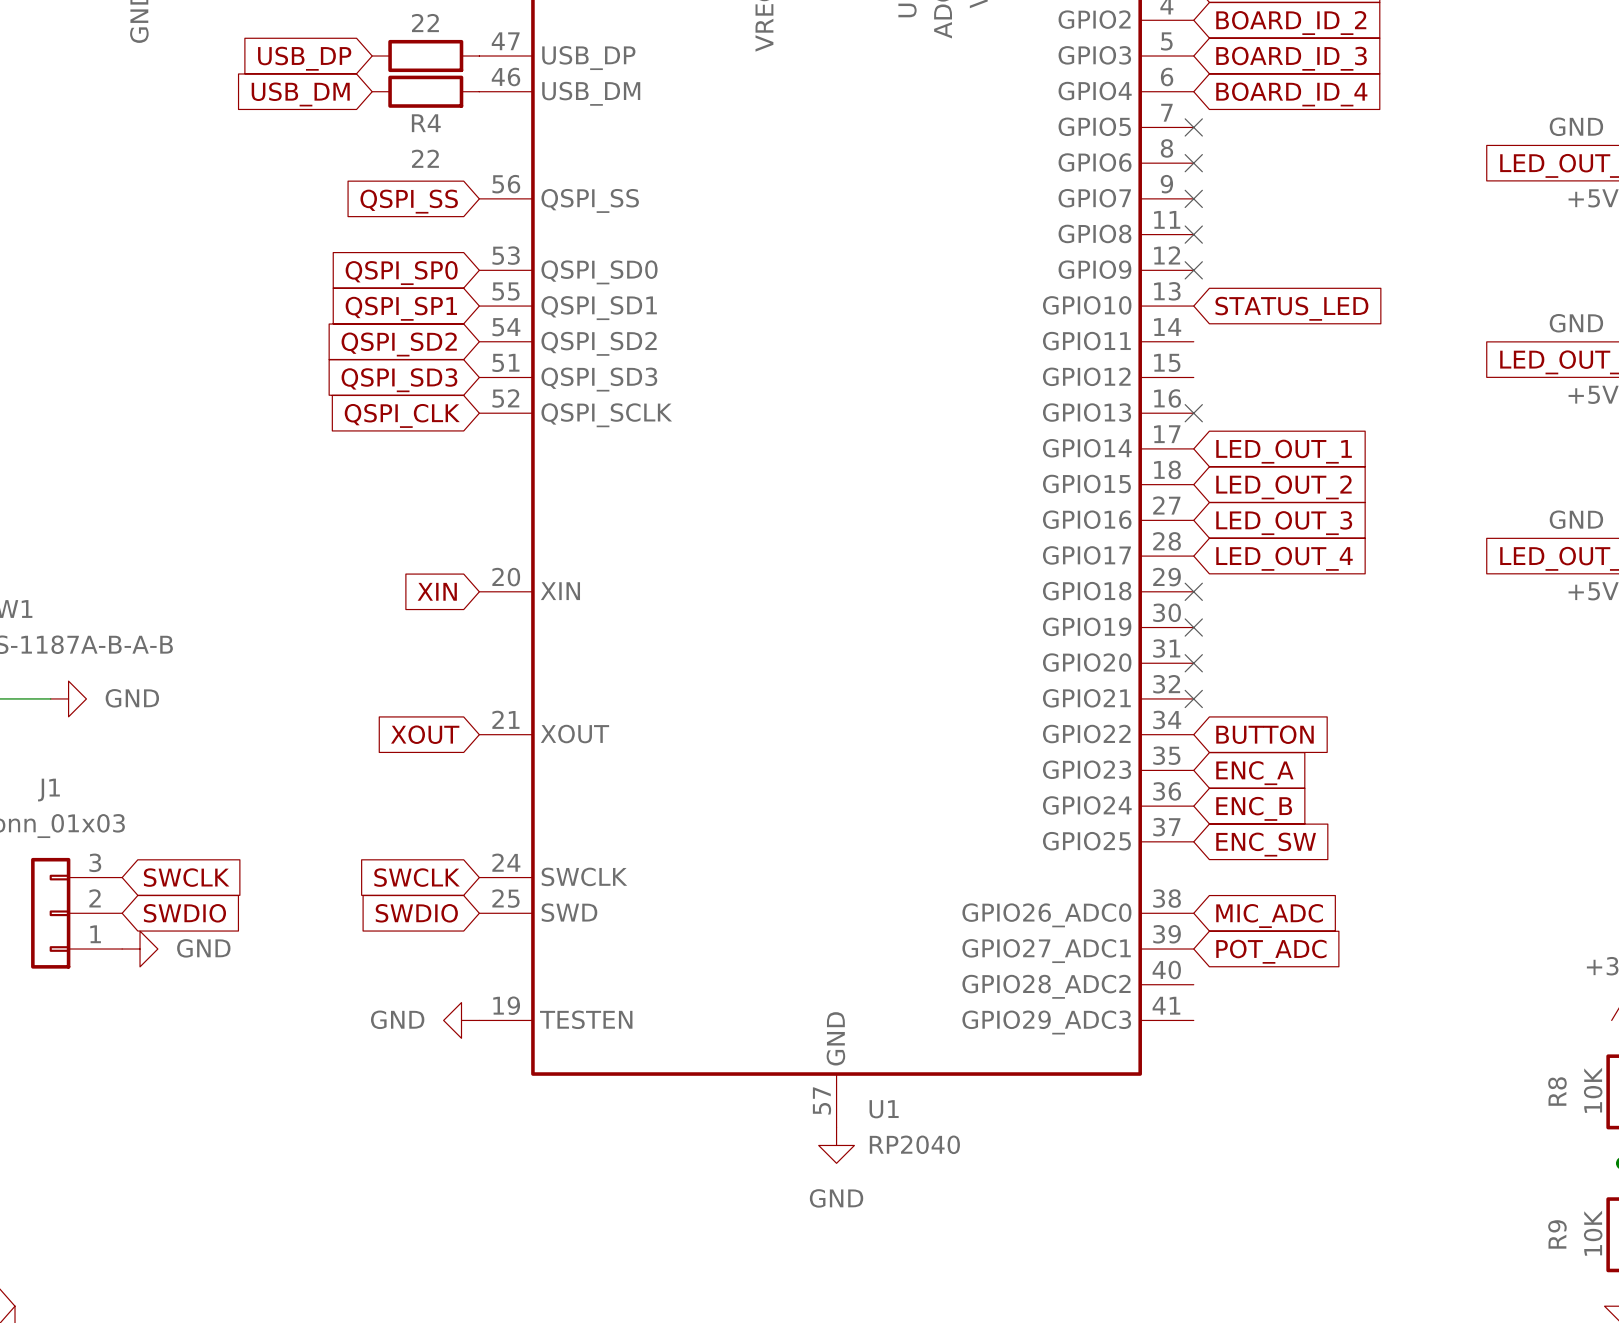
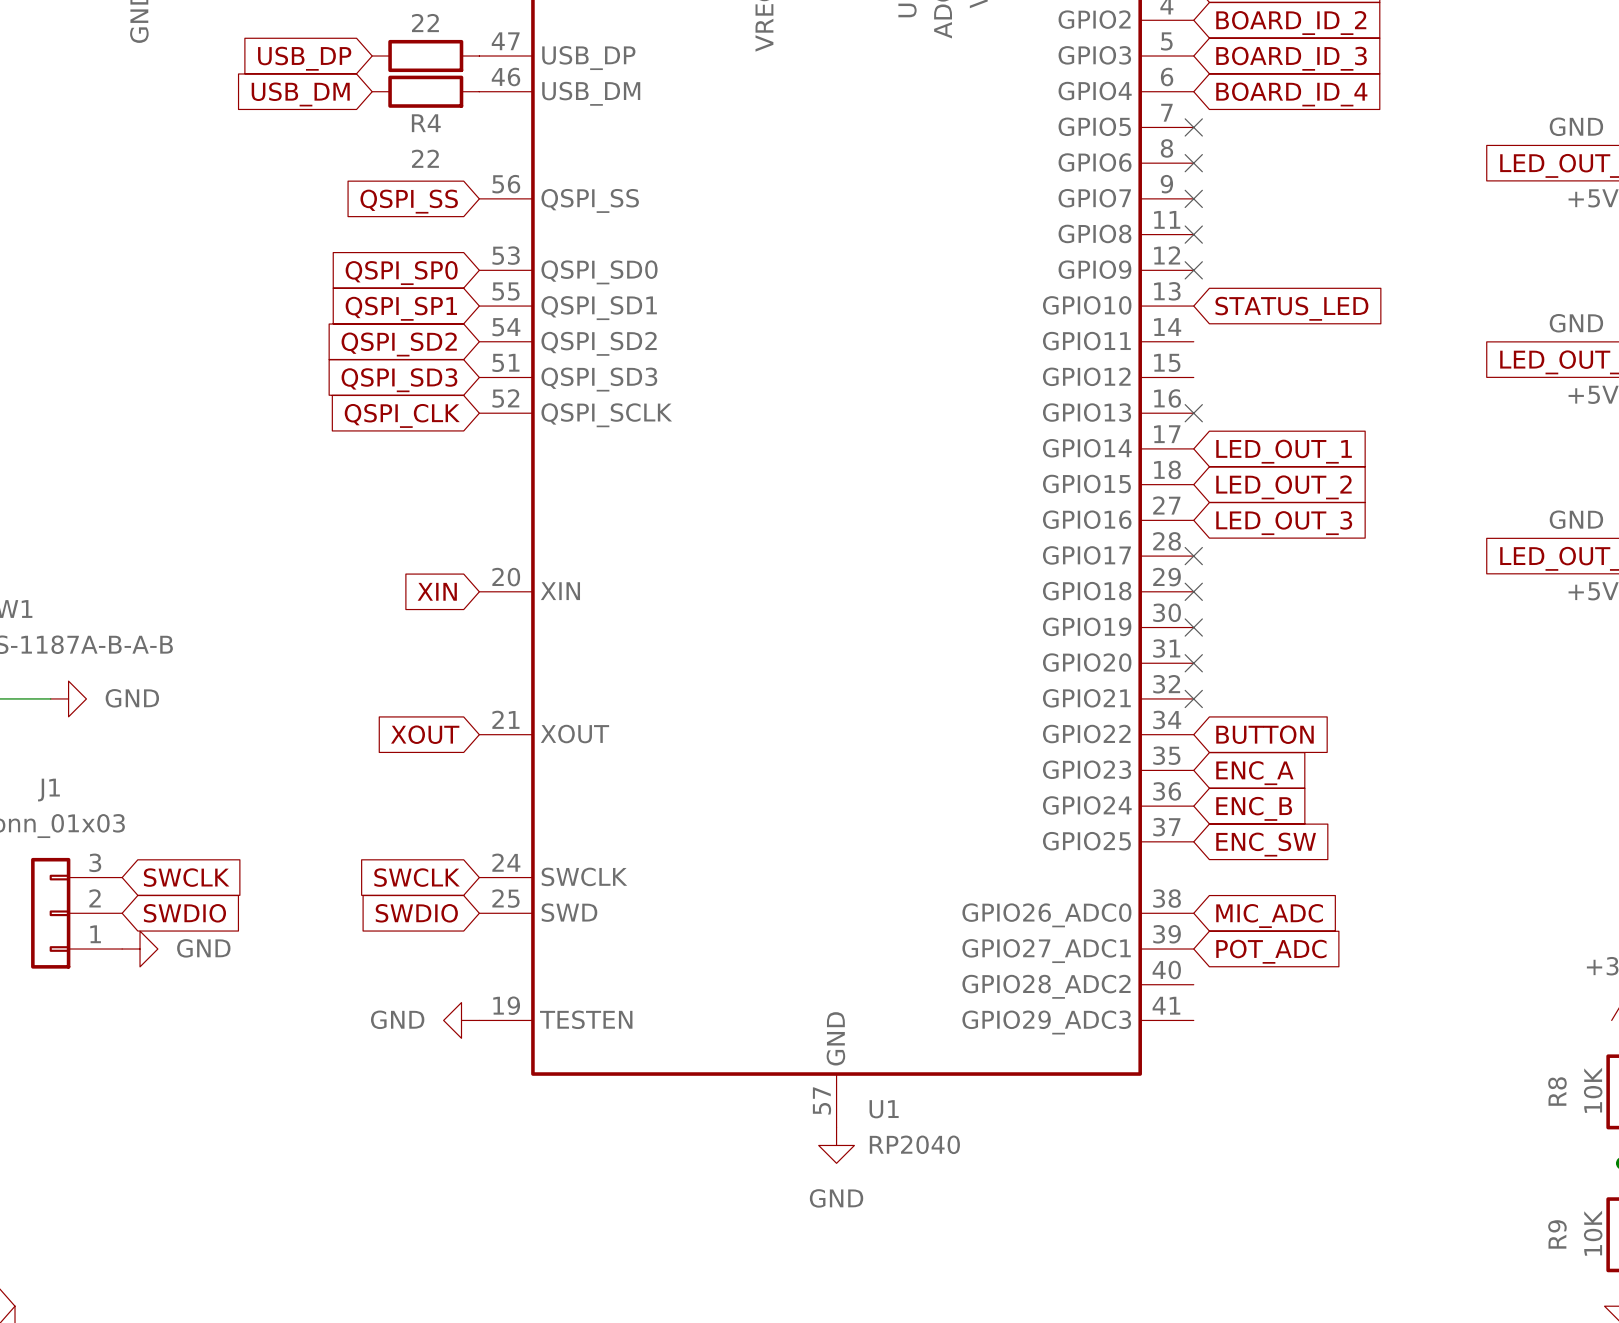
no-connect mark: none -> (1193, 556)
global label: LED_OUT_4 (1284, 558) -> none

